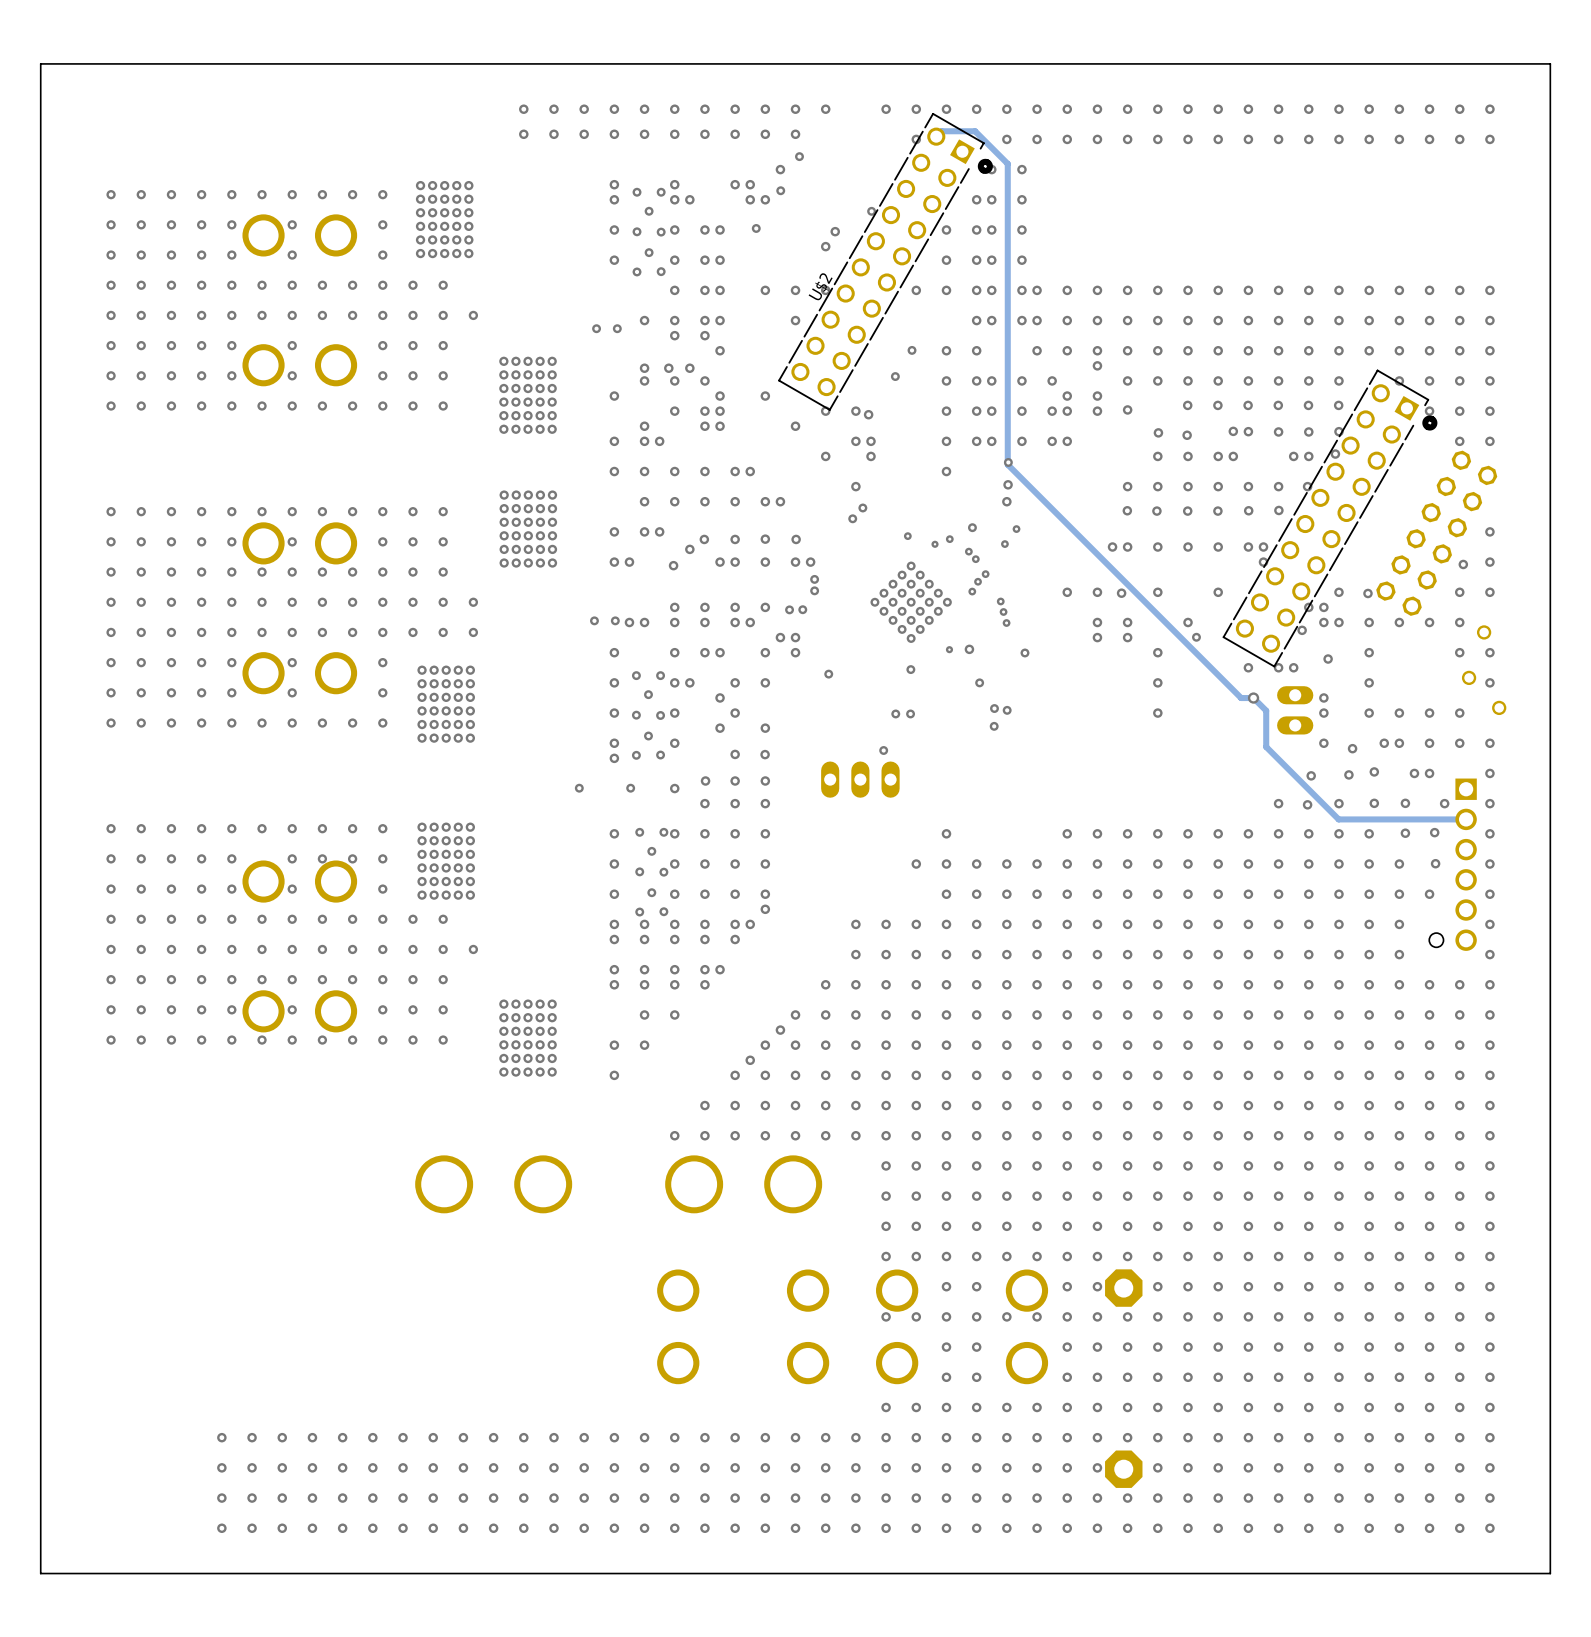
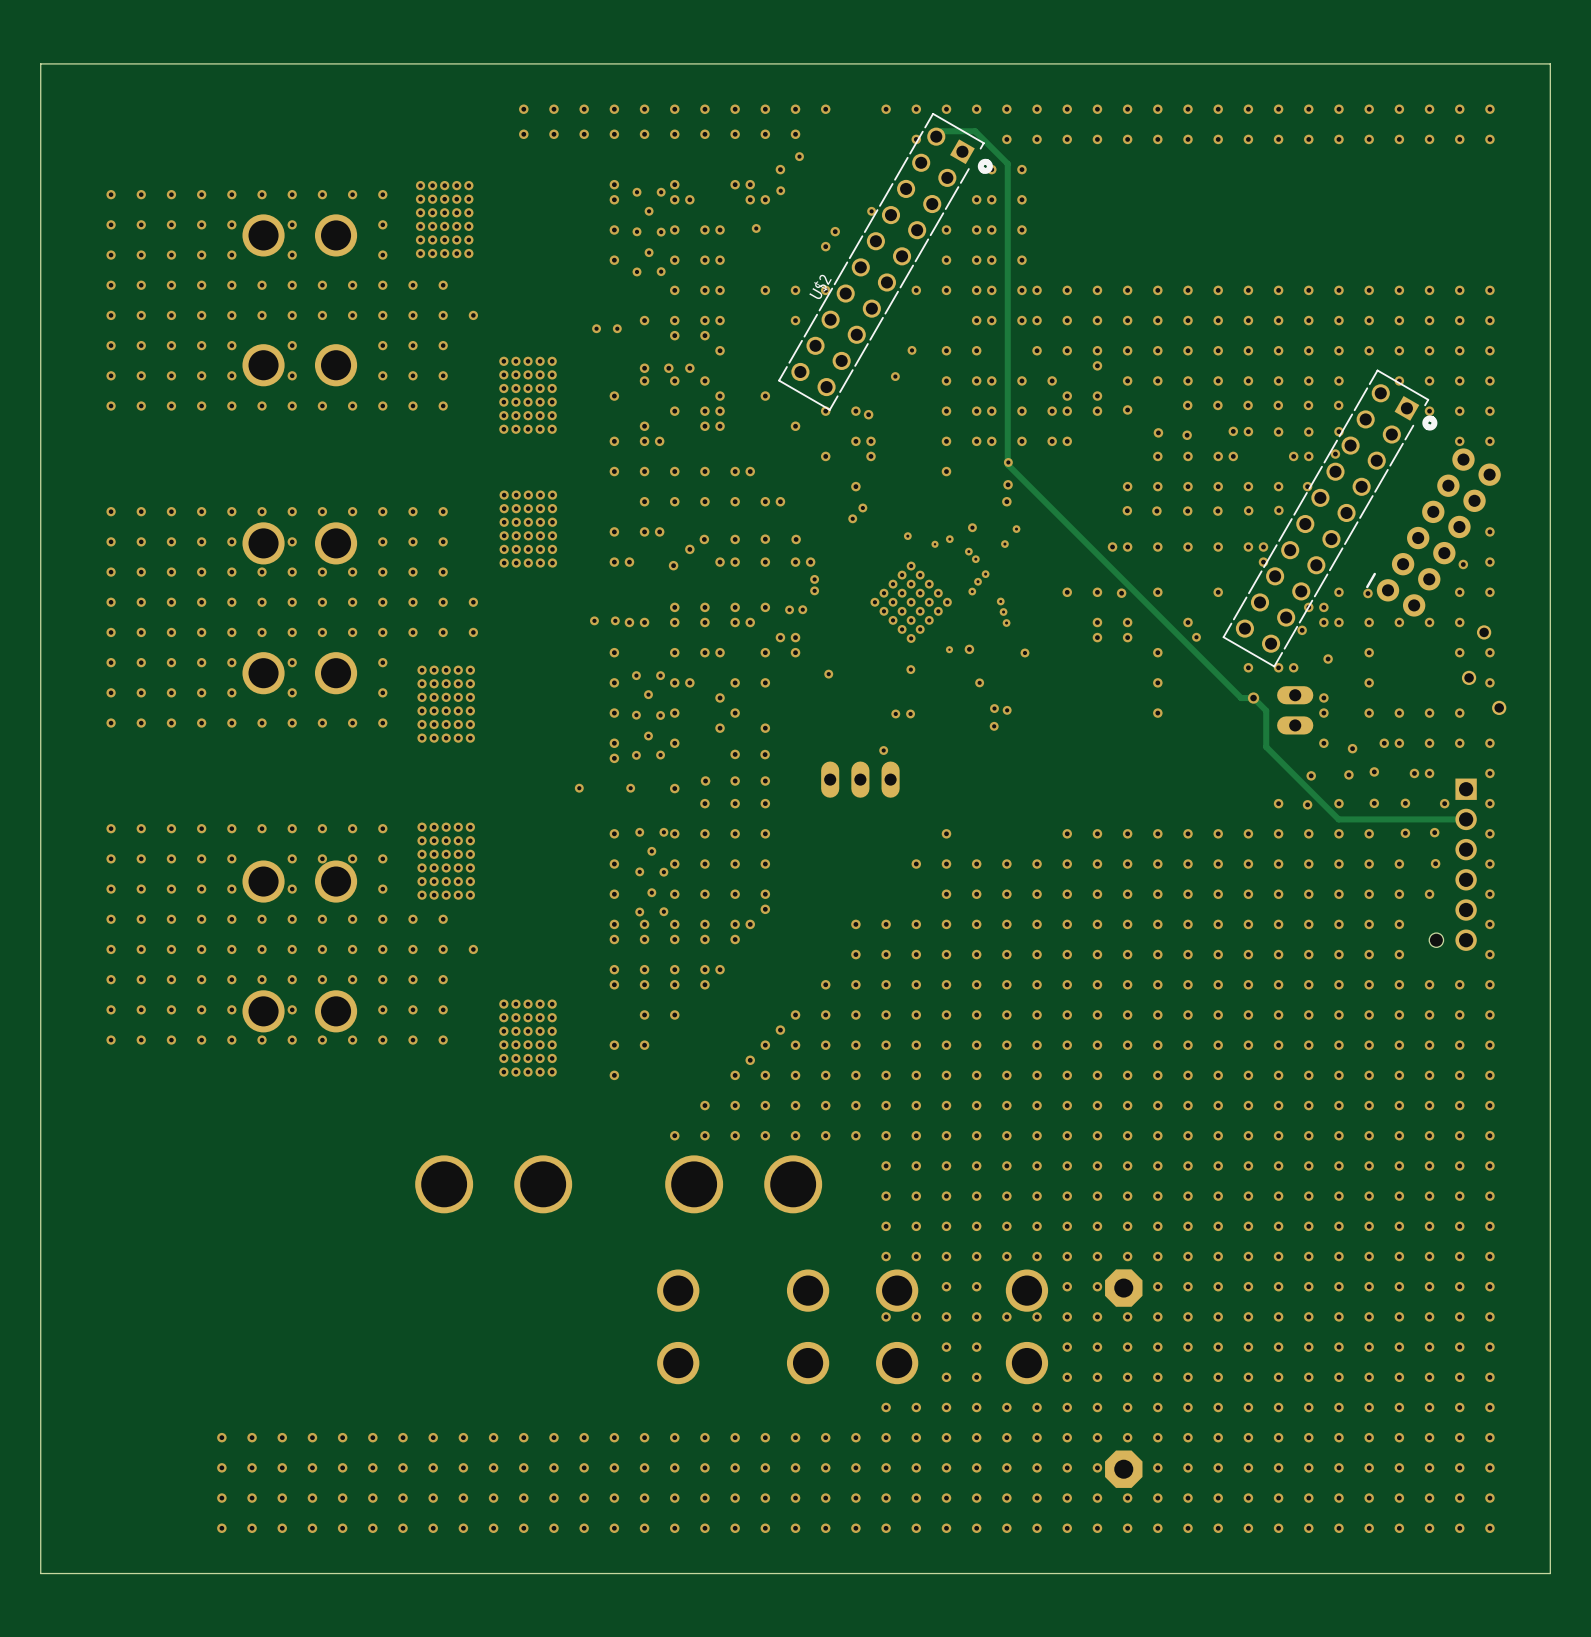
part footprint: [1376, 450, 1498, 616] -> [1366, 448, 1501, 617]

